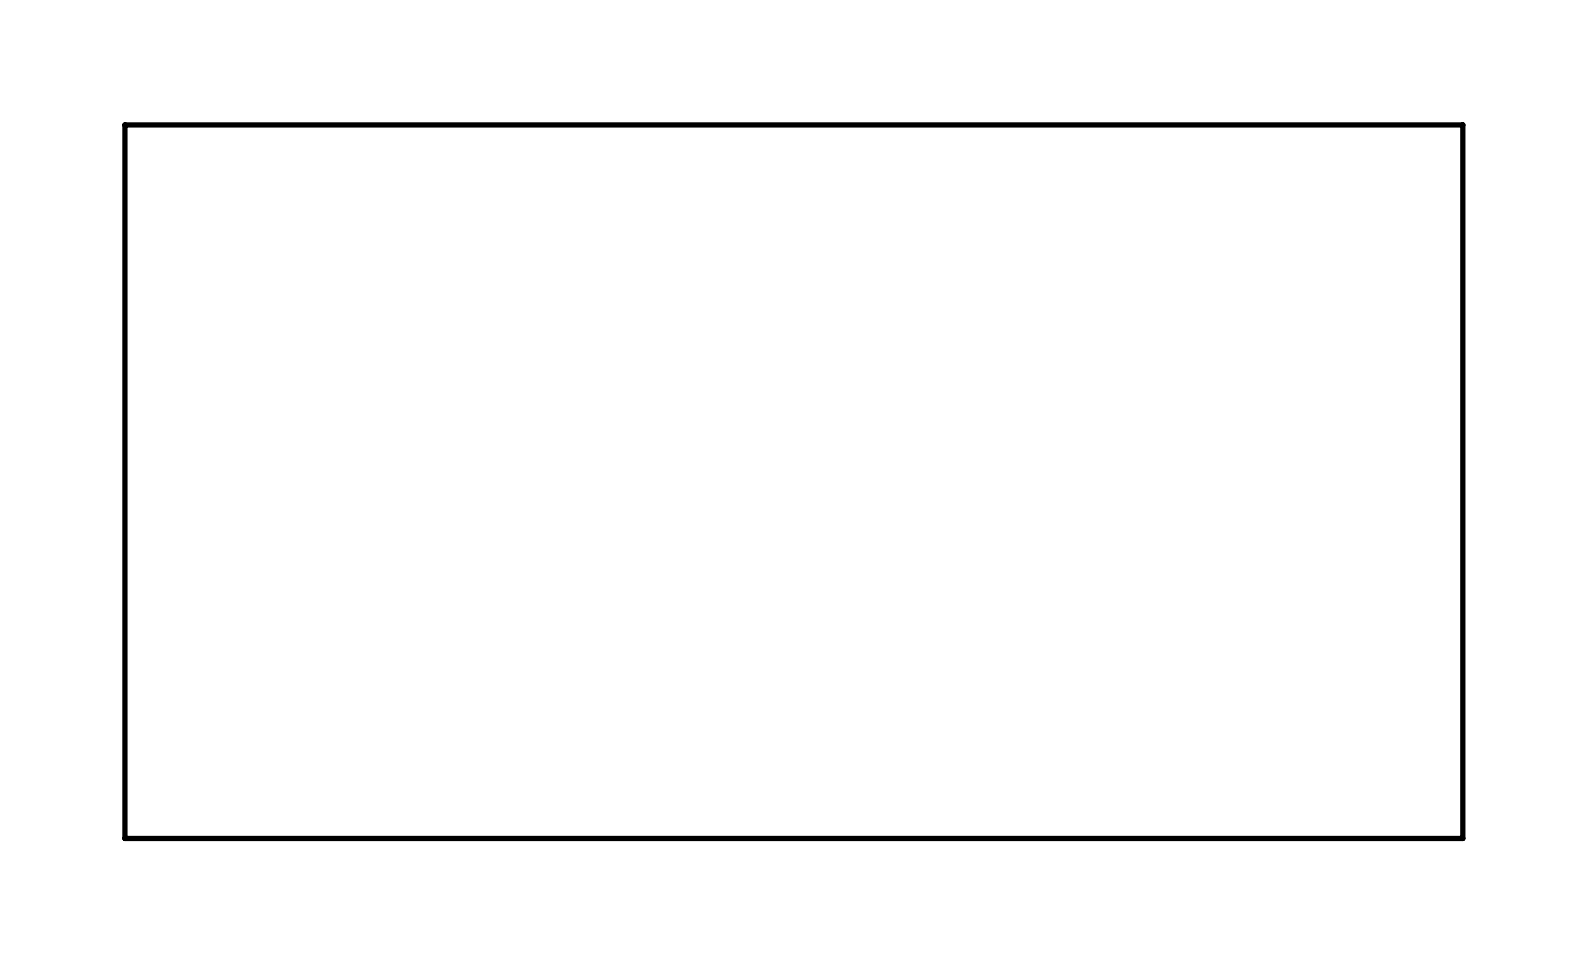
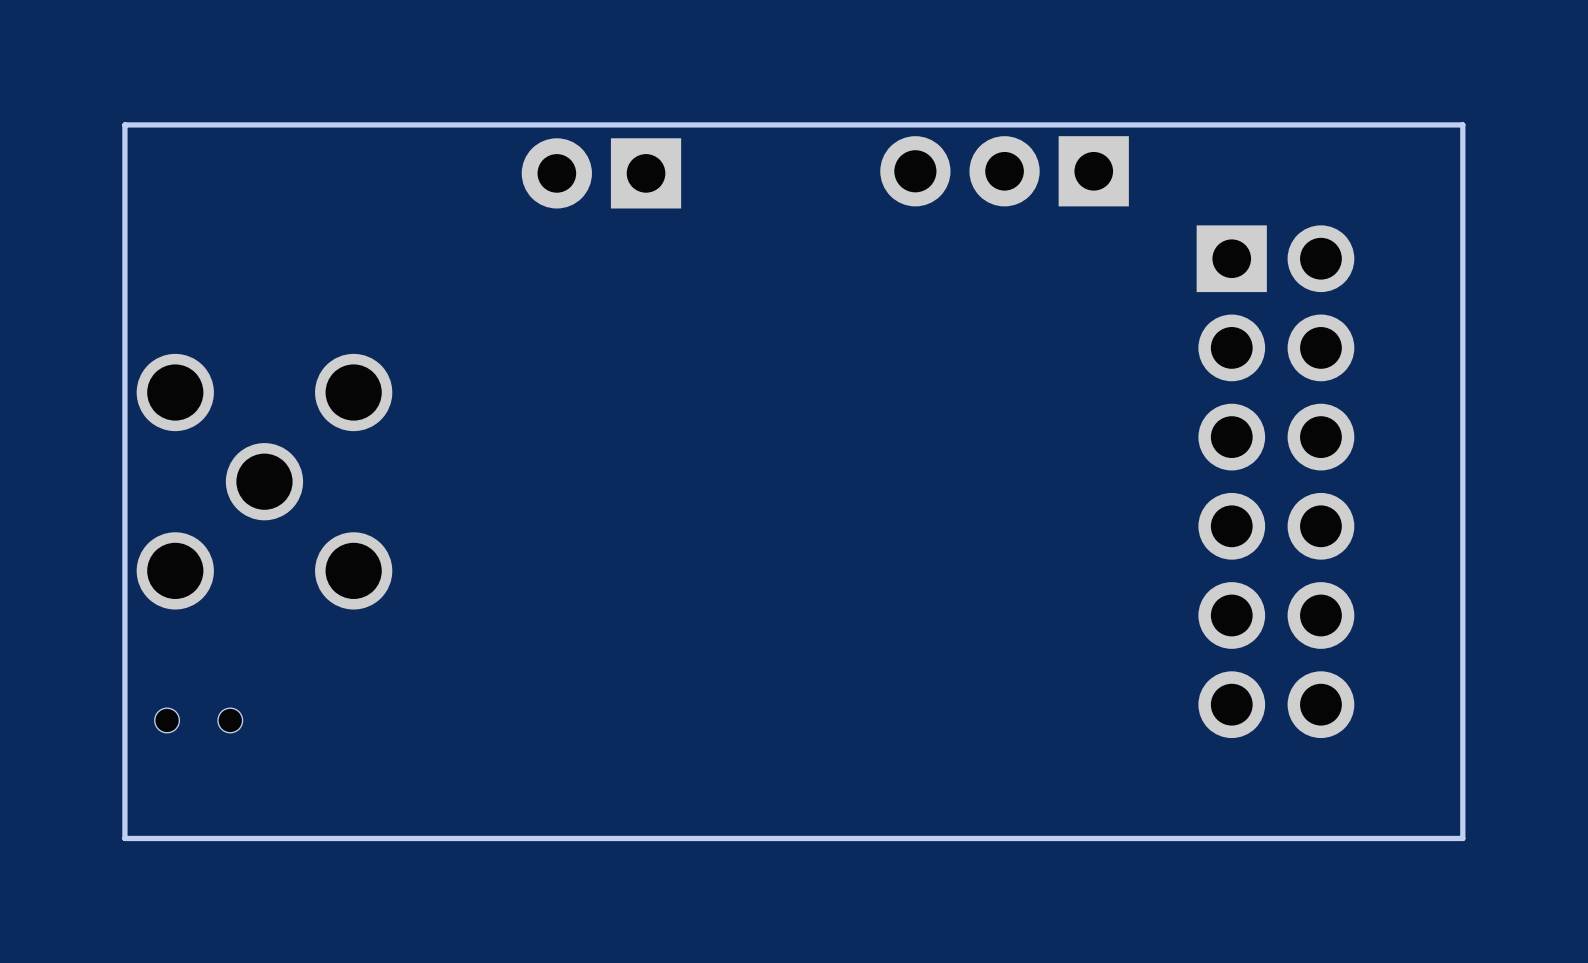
part: none -> (1004, 171)
part: none -> (601, 173)
part: none -> (264, 481)
part: none -> (1275, 481)
part: none -> (198, 720)

